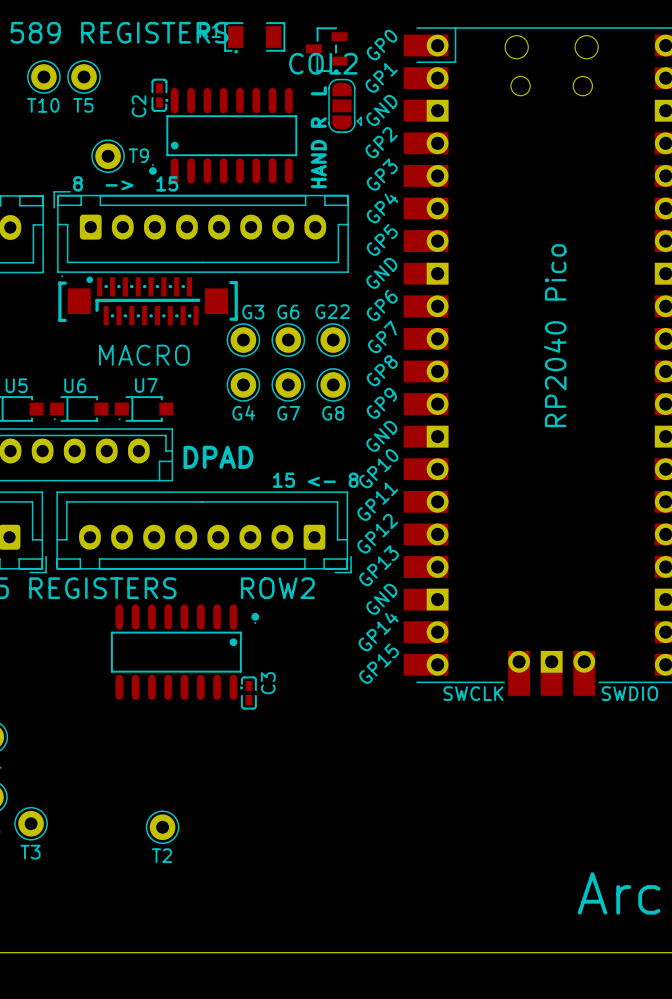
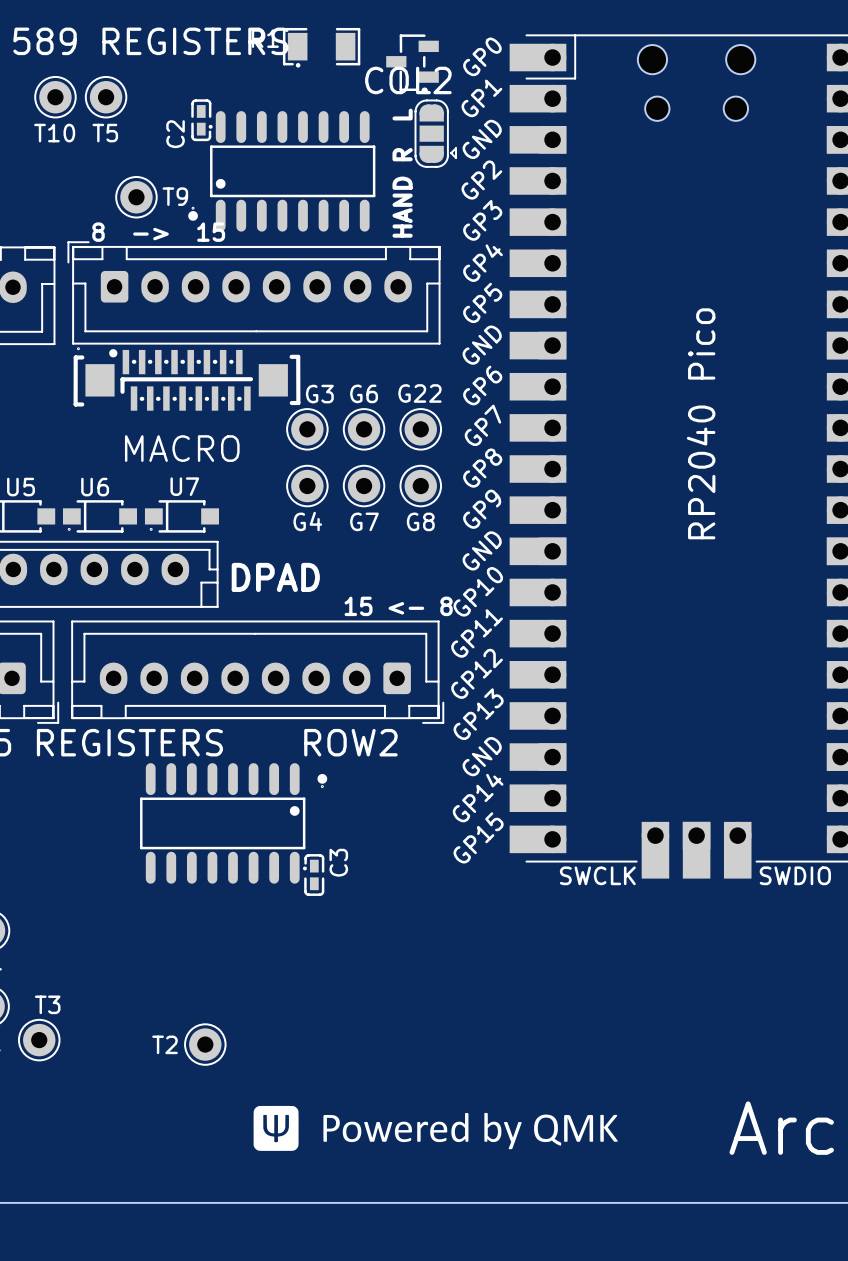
T3 name position: T3 (30, 852) -> T3 (47, 1004)
T2 name position: T2 (161, 855) -> T2 (165, 1044)
drawing: none -> [253, 1105, 618, 1151]

